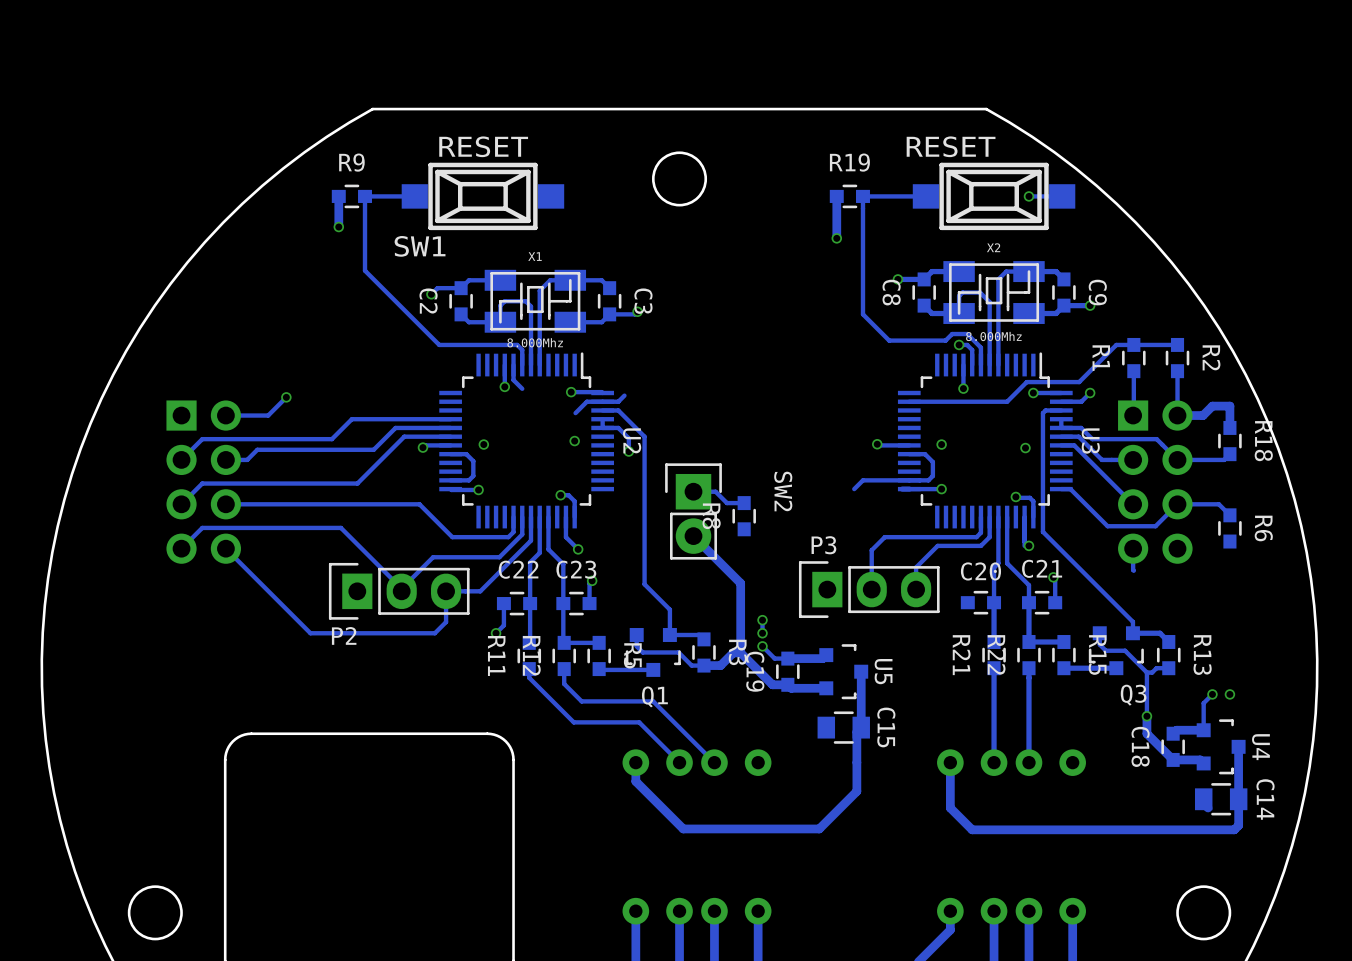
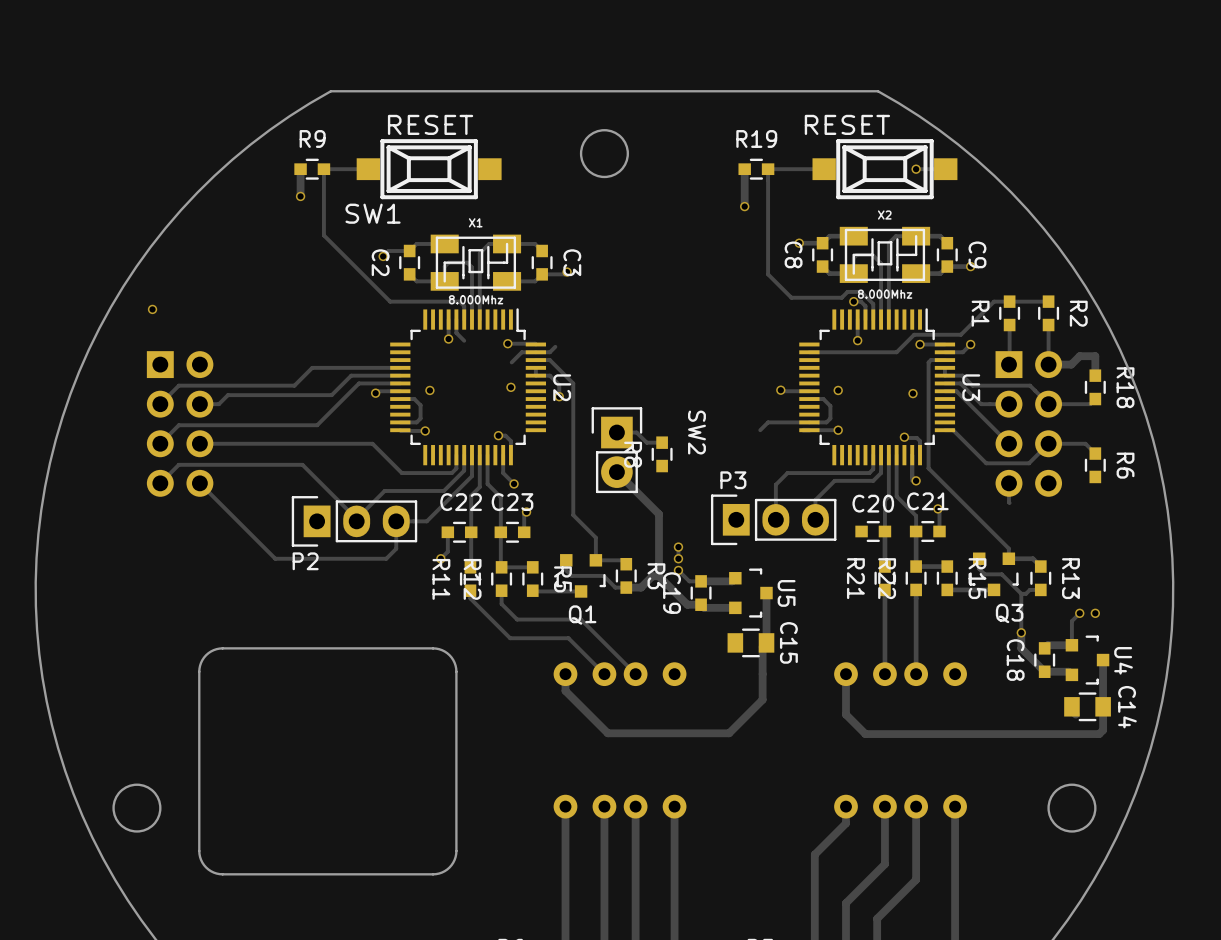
via: none -> (152, 309)
track: (286, 397) (268, 415) (225, 415) -> none
via: (286, 397) -> none

